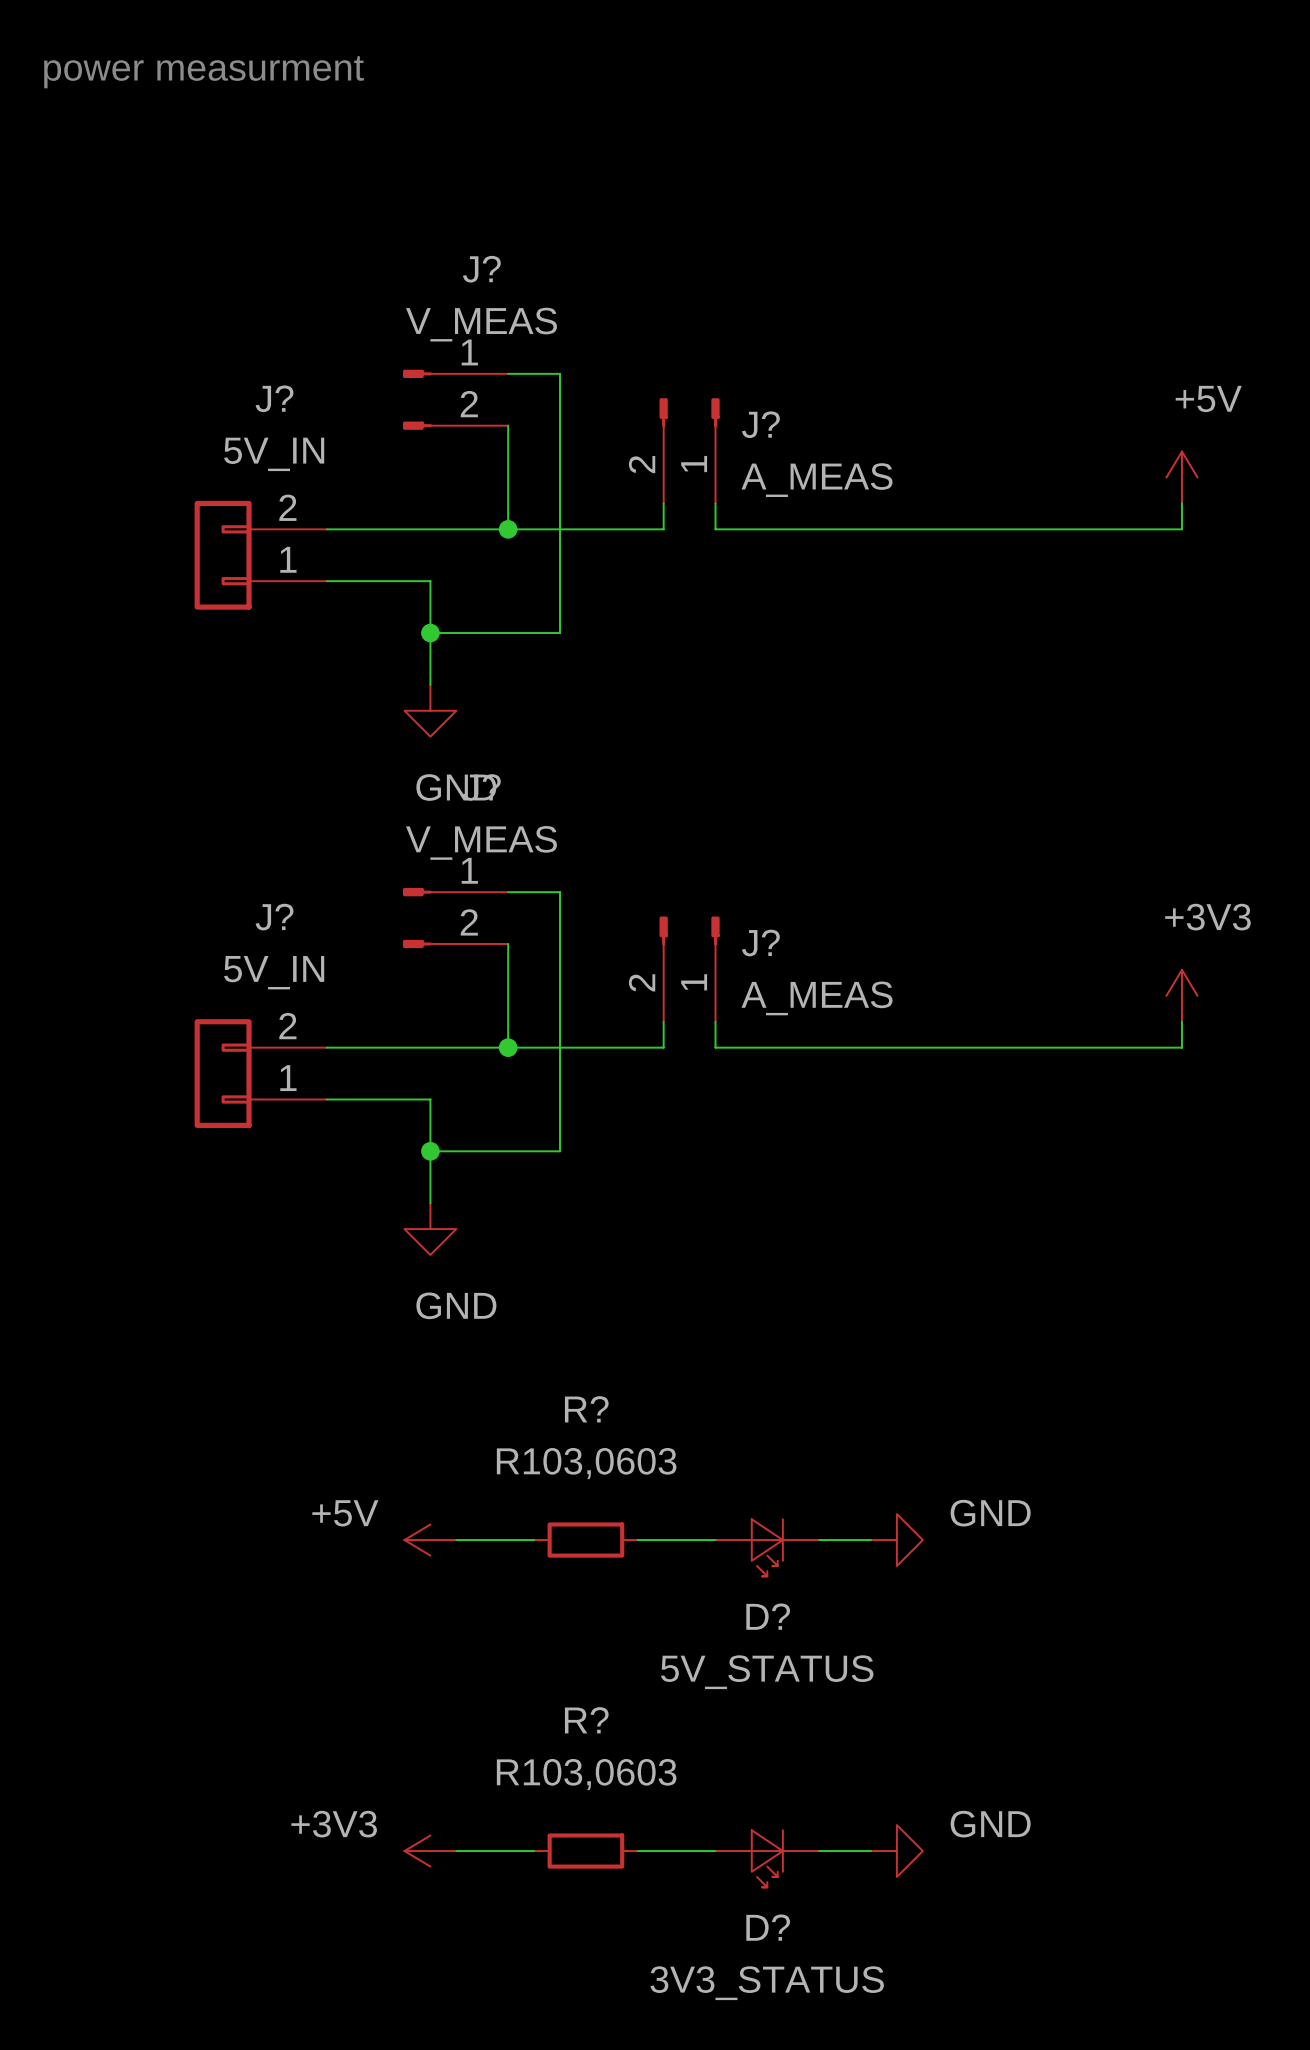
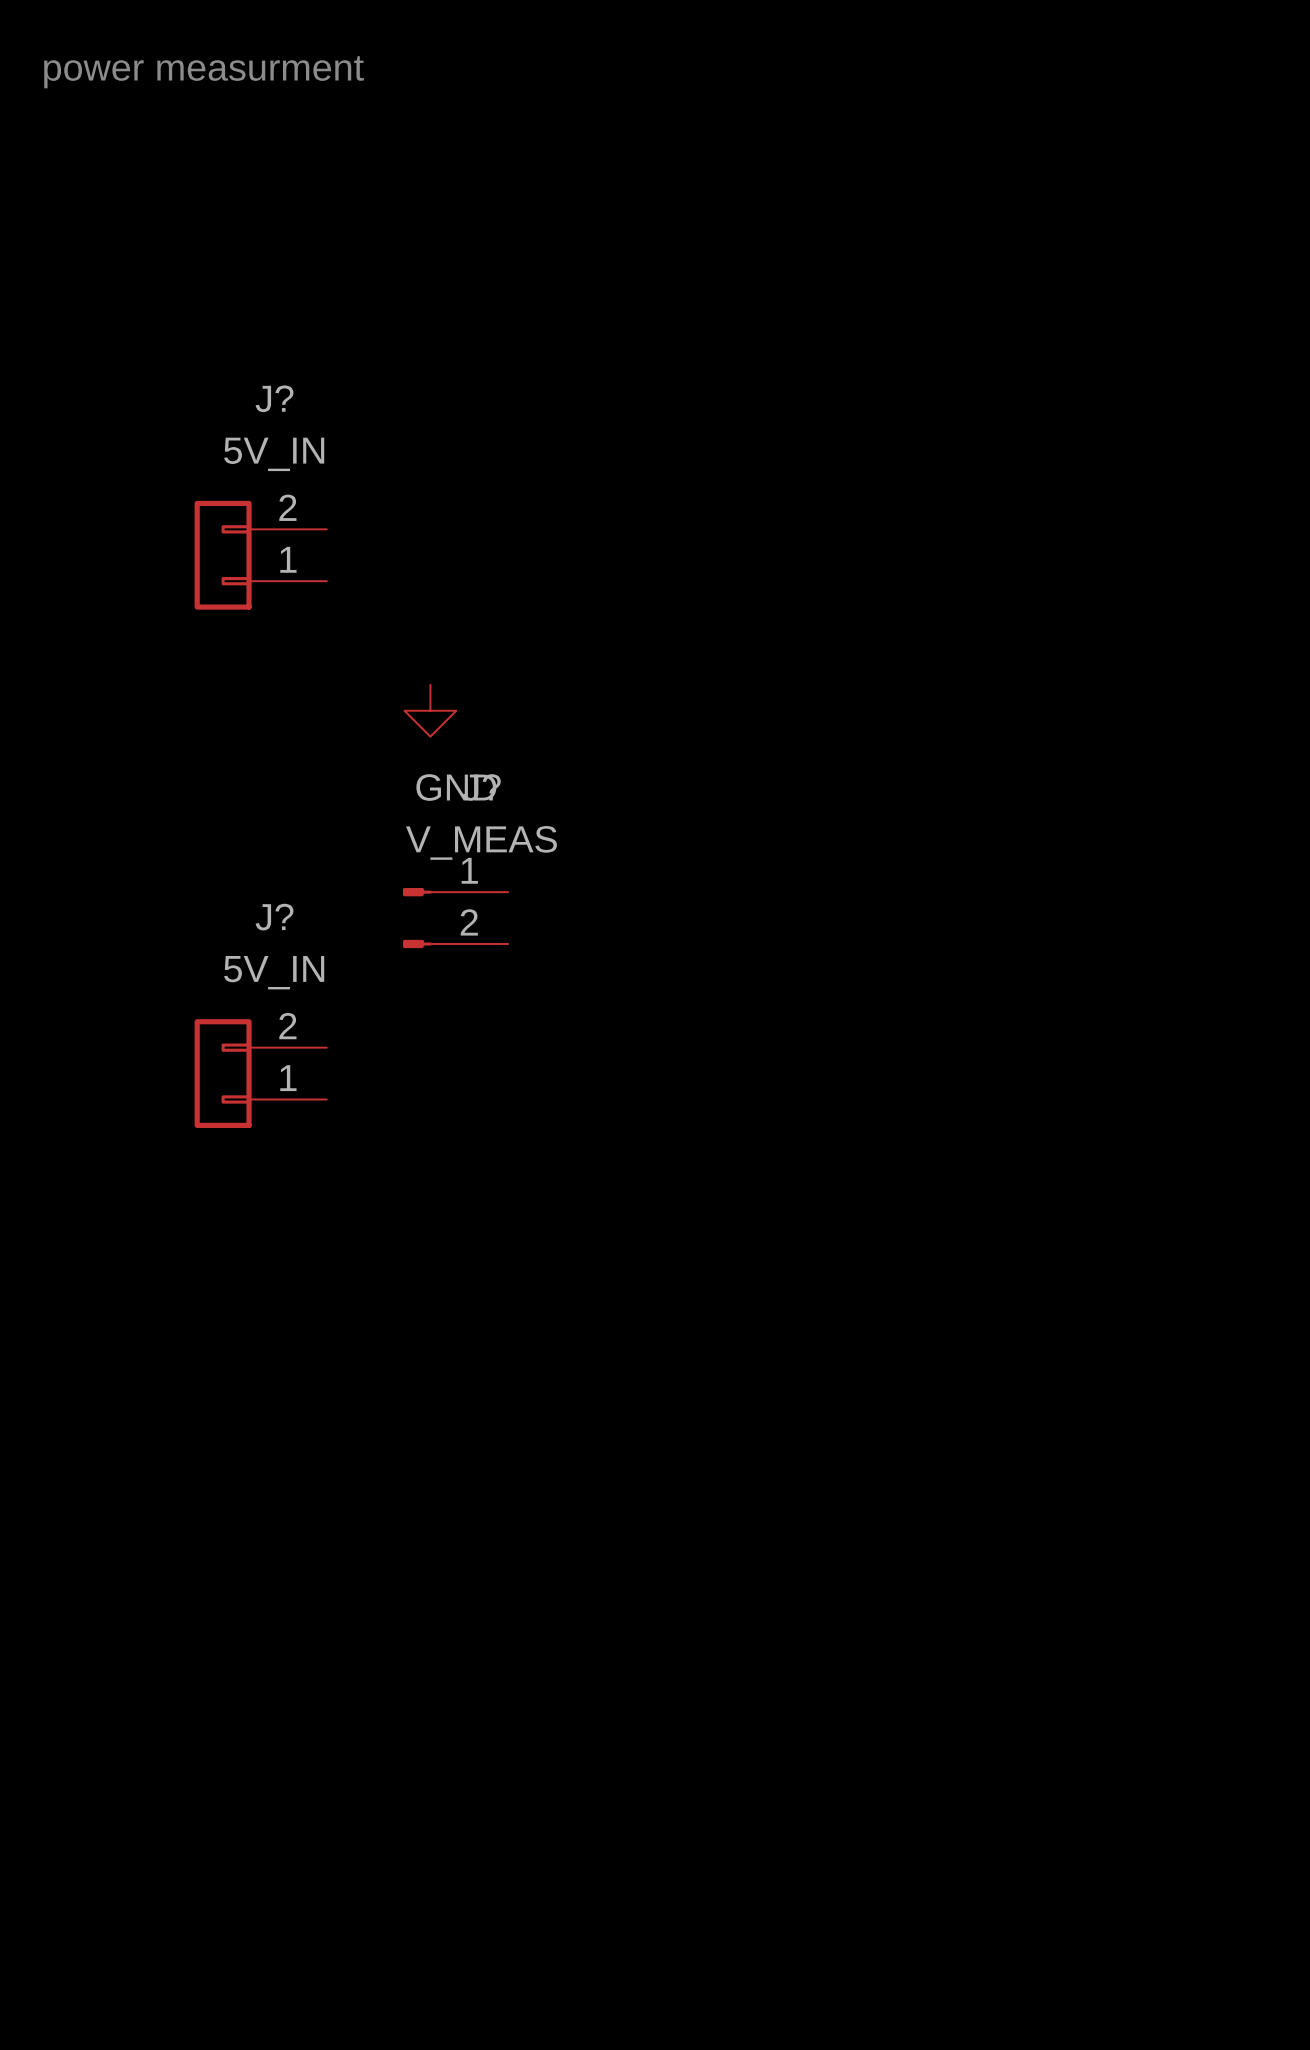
wire: (508, 373) (560, 373) (560, 633) (430, 633) -> none
J?: V_MEAS (455, 399) -> none
wire: (508, 425) (508, 529) -> none
J?: A_MEAS (689, 450) -> none
power symbol: +5V (1181, 477) -> none
wire: (663, 503) (663, 529) (326, 529) -> none
wire: (715, 503) (715, 529) (1181, 529) (1181, 503) -> none
junction: (508, 529) -> none
wire: (326, 581) (430, 581) (430, 684) -> none
junction: (430, 633) -> none
wire: (508, 892) (560, 892) (560, 1151) (430, 1151) -> none
wire: (508, 943) (508, 1047) -> none
J?: A_MEAS (689, 969) -> none
power symbol: +3V3 (1181, 995) -> none
wire: (663, 1021) (663, 1047) (326, 1047) -> none
wire: (715, 1021) (715, 1047) (1181, 1047) (1181, 1021) -> none
junction: (508, 1047) -> none
wire: (326, 1099) (430, 1099) (430, 1203) -> none
junction: (430, 1151) -> none
power symbol: GND (430, 1229) -> none
power symbol: +5V (430, 1540) -> none
wire: (456, 1540) (534, 1540) -> none
R?: R103,0603 (585, 1540) -> none
wire: (637, 1540) (715, 1540) -> none
wire: (819, 1540) (870, 1540) -> none
power symbol: GND (896, 1540) -> none
D?: 5V_STATUS (767, 1547) -> none
power symbol: +3V3 (430, 1851) -> none
wire: (456, 1851) (534, 1851) -> none
R?: R103,0603 (585, 1851) -> none
wire: (637, 1851) (715, 1851) -> none
wire: (819, 1851) (870, 1851) -> none
power symbol: GND (896, 1851) -> none
D?: 3V3_STATUS (767, 1858) -> none

